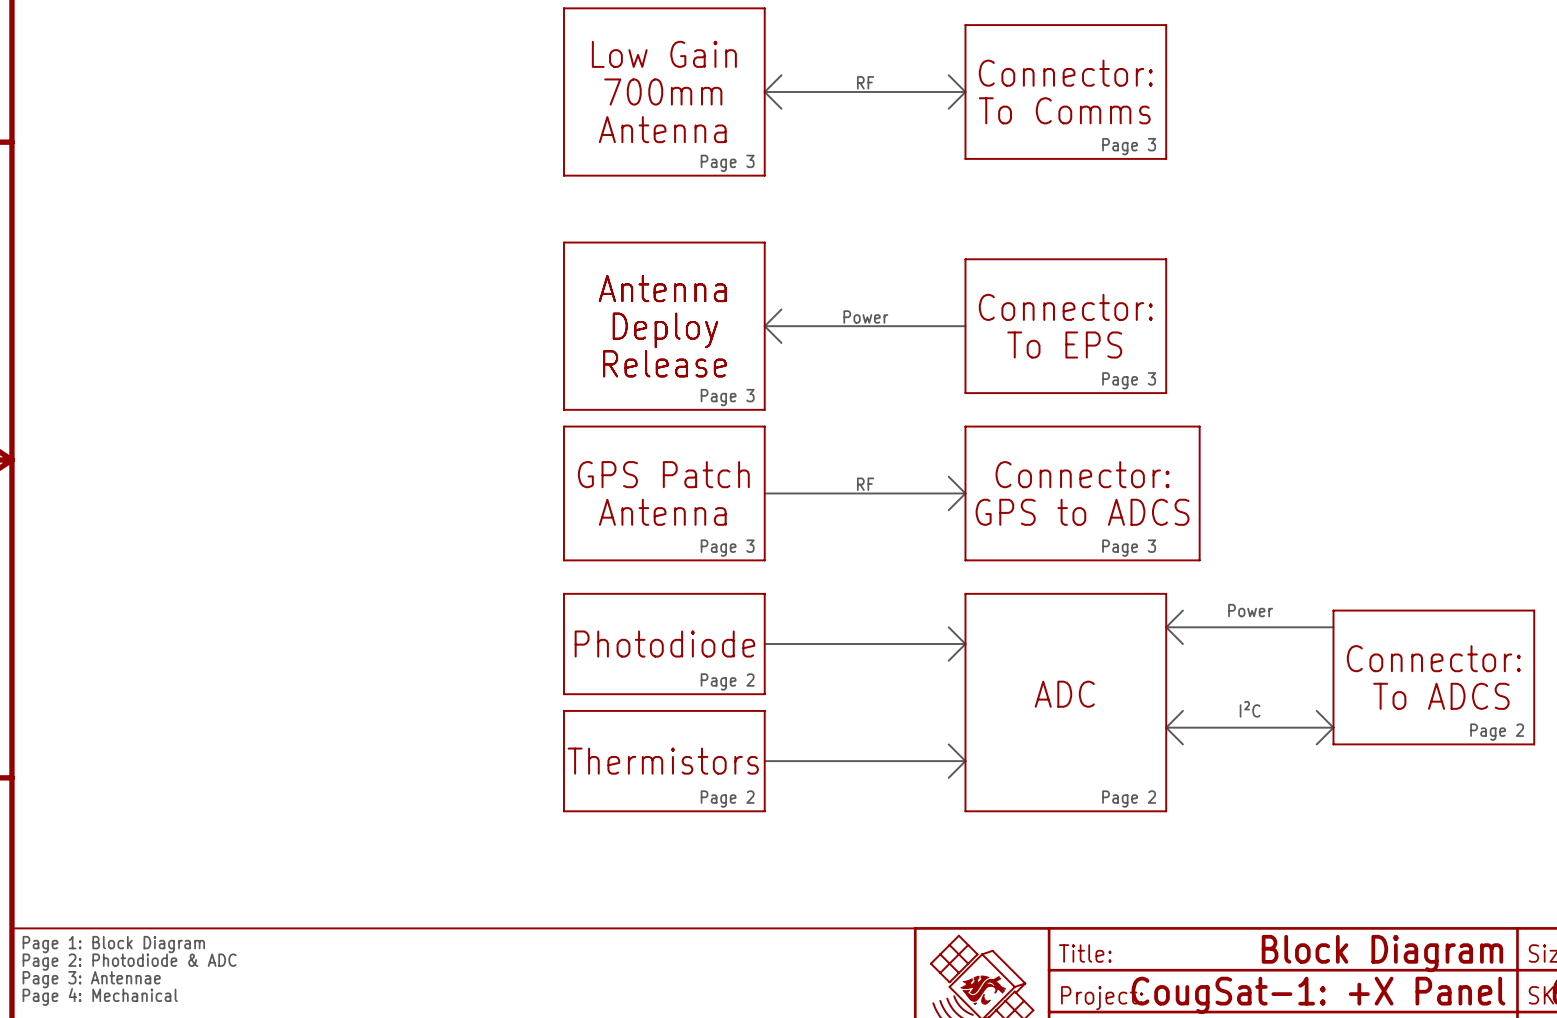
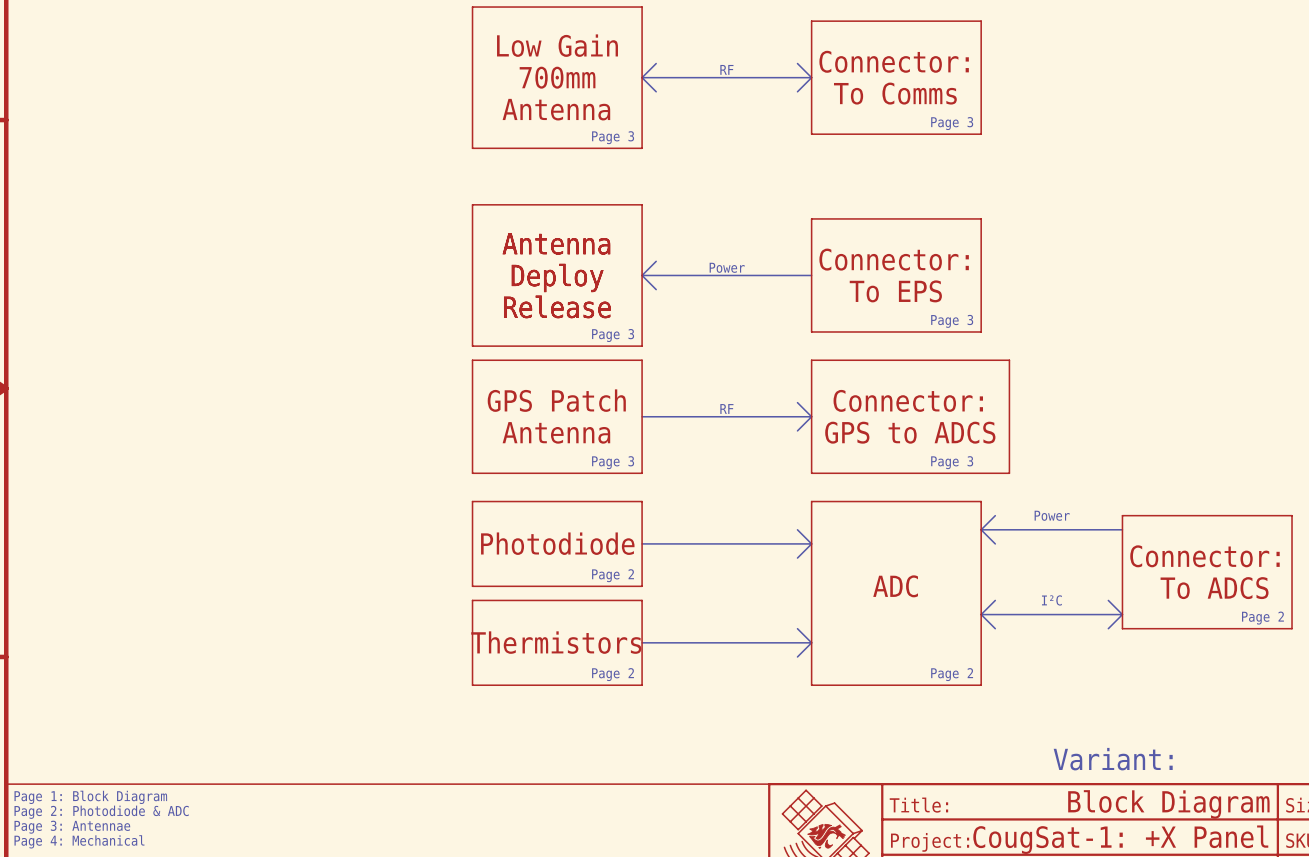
text: none -> Variant: (1113, 759)

